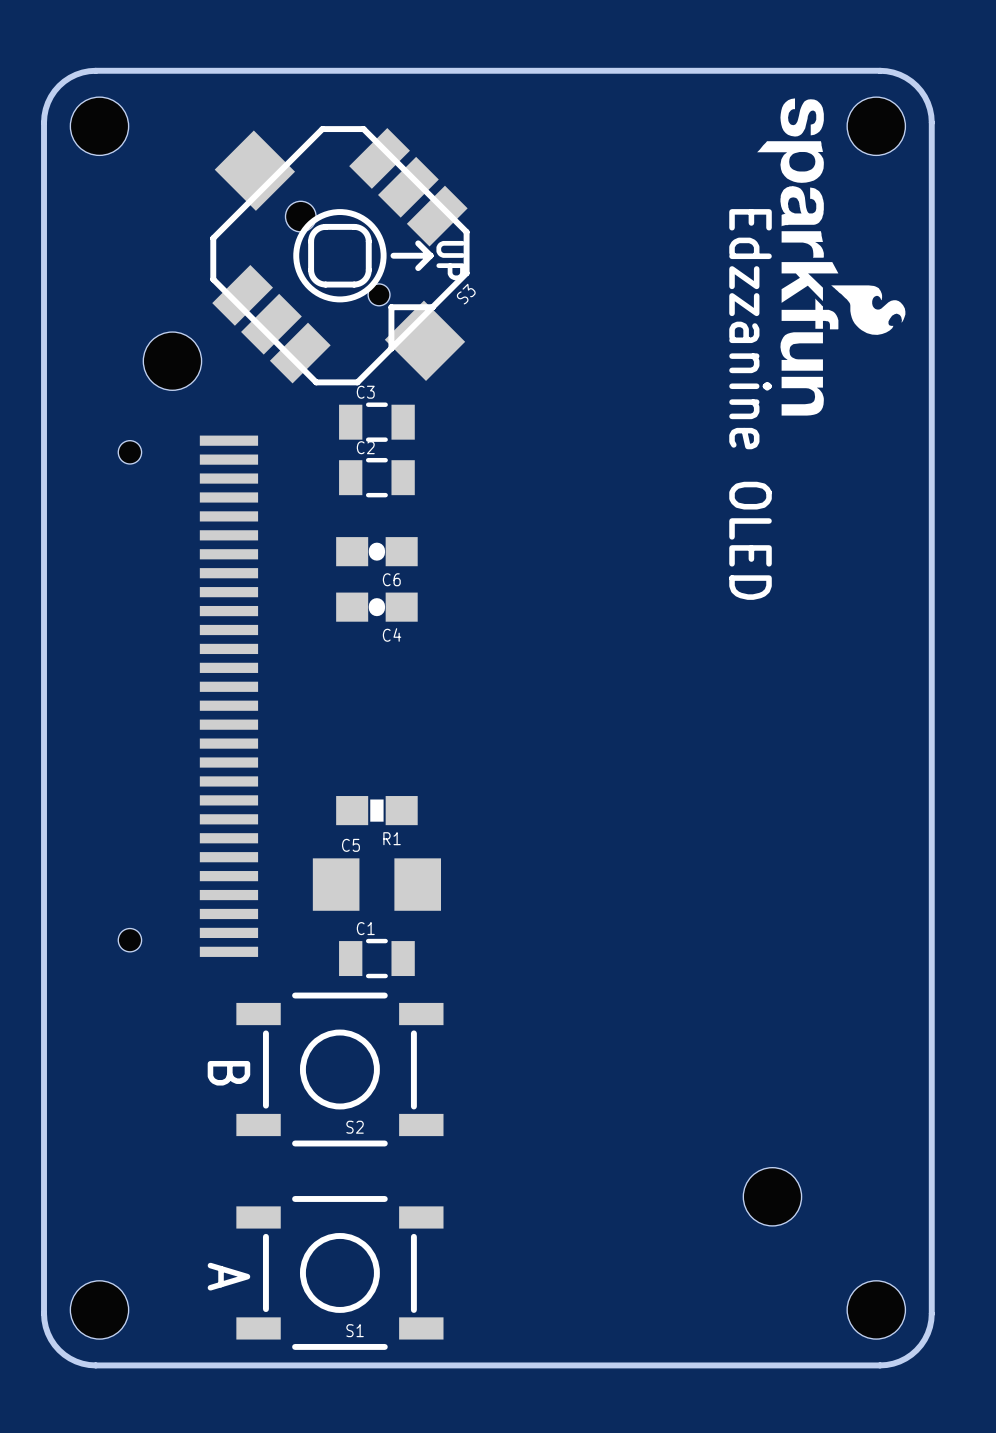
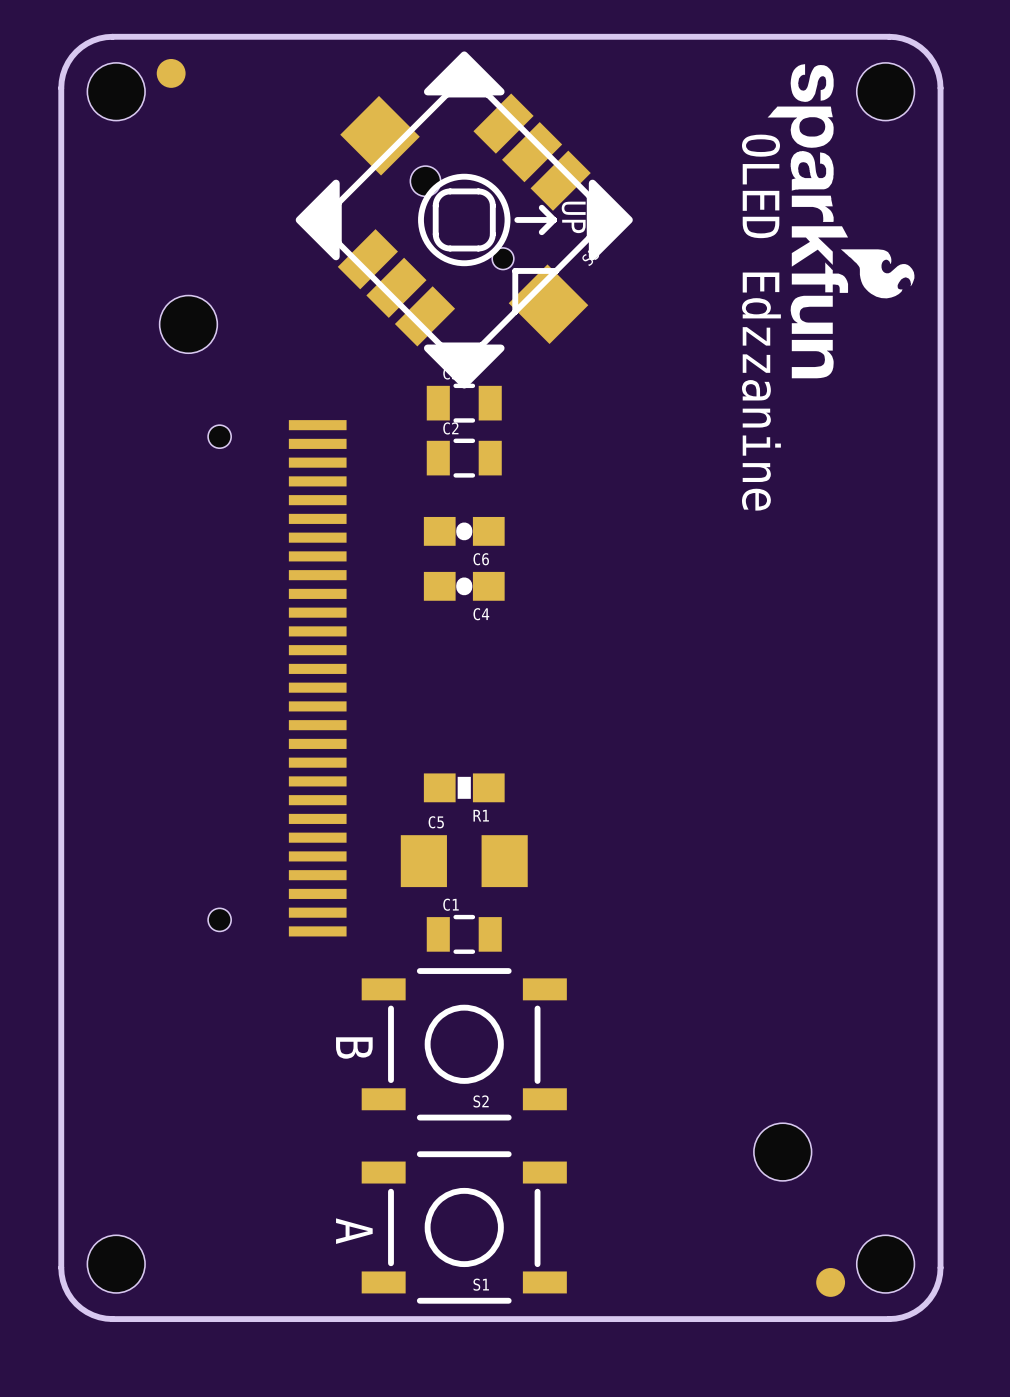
drawing: none -> [423, 51, 505, 96]
part: none -> (171, 73)
drawing: none -> [295, 179, 340, 261]
drawing: none -> [588, 179, 633, 261]
S3 position: (339, 255) -> (464, 219)
drawing: none -> [423, 344, 505, 389]
text: Edzzanine OLED (750, 404) -> OLED Edzzanine (761, 322)
C3 position: (376, 422) -> (464, 403)
C2 position: (376, 477) -> (464, 458)
C6 position: (376, 551) -> (464, 531)
C4 position: (376, 607) -> (464, 586)
part position: (188, 696) -> (277, 678)
R1 position: (376, 810) -> (464, 787)
C5 position: (376, 884) -> (464, 861)
C1 position: (376, 958) -> (464, 934)
S2 position: (339, 1069) -> (464, 1044)
text position: B (228, 1073) -> B (354, 1048)
S1 position: (339, 1272) -> (464, 1227)
text position: A (228, 1276) -> A (354, 1231)
part: none -> (830, 1282)

